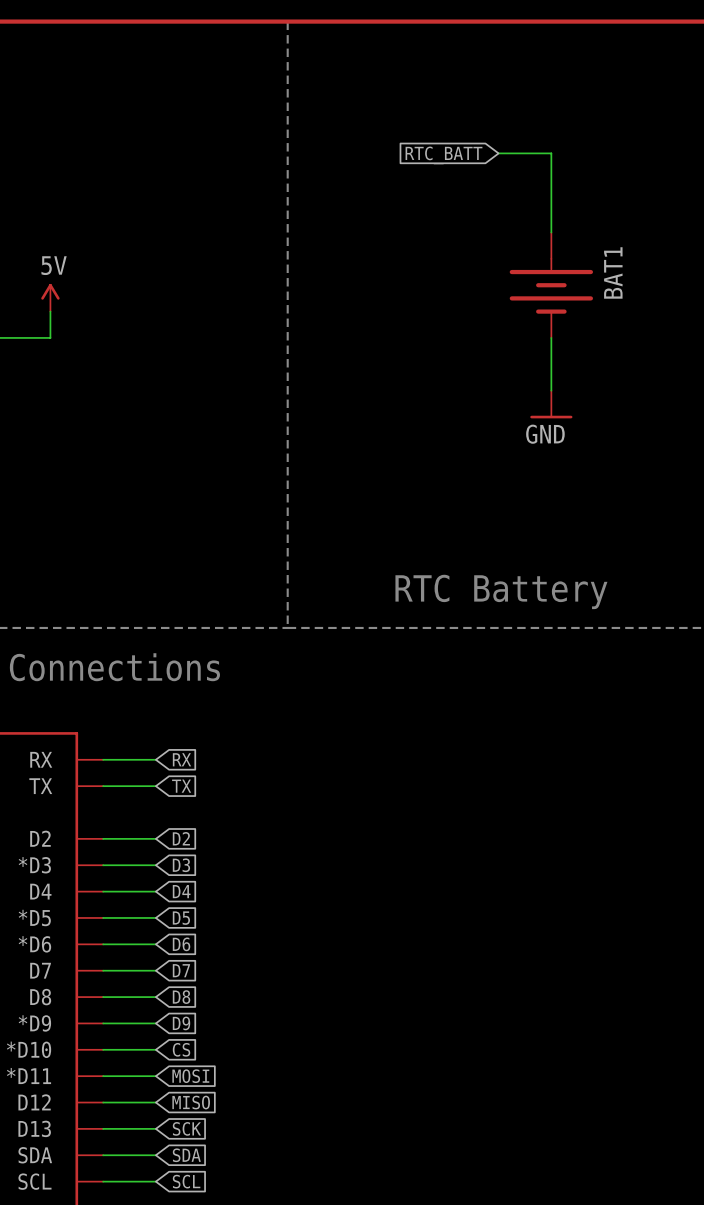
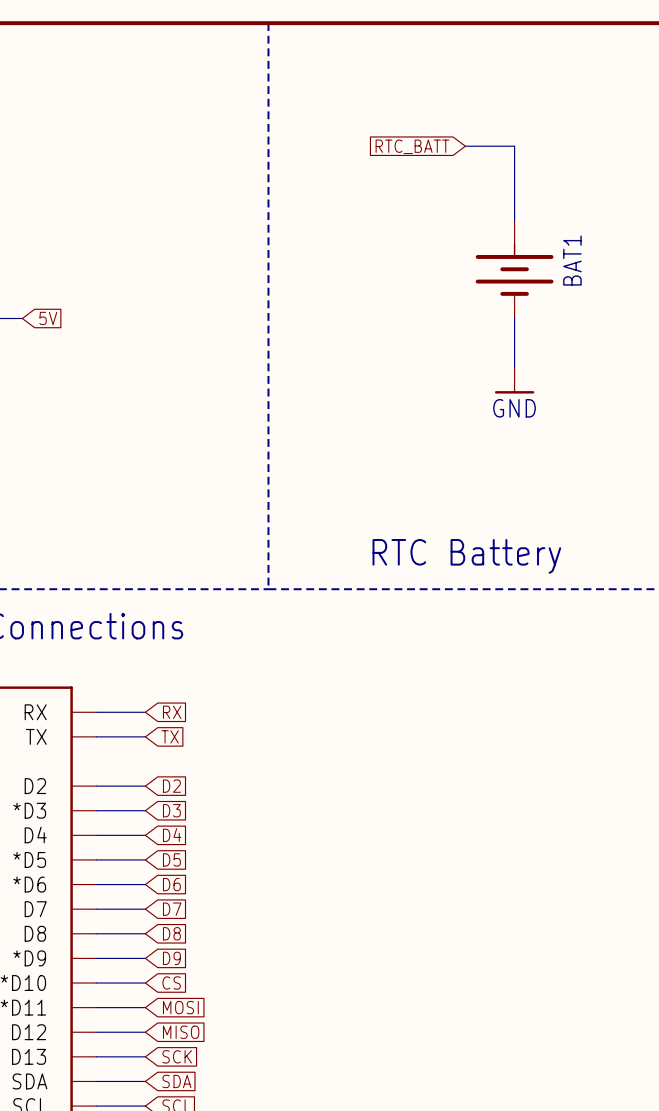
power symbol: 5V (50, 297) -> none
wire: (50, 311) (50, 337) (24, 337) -> none
global label: none -> 5V (48, 318)

